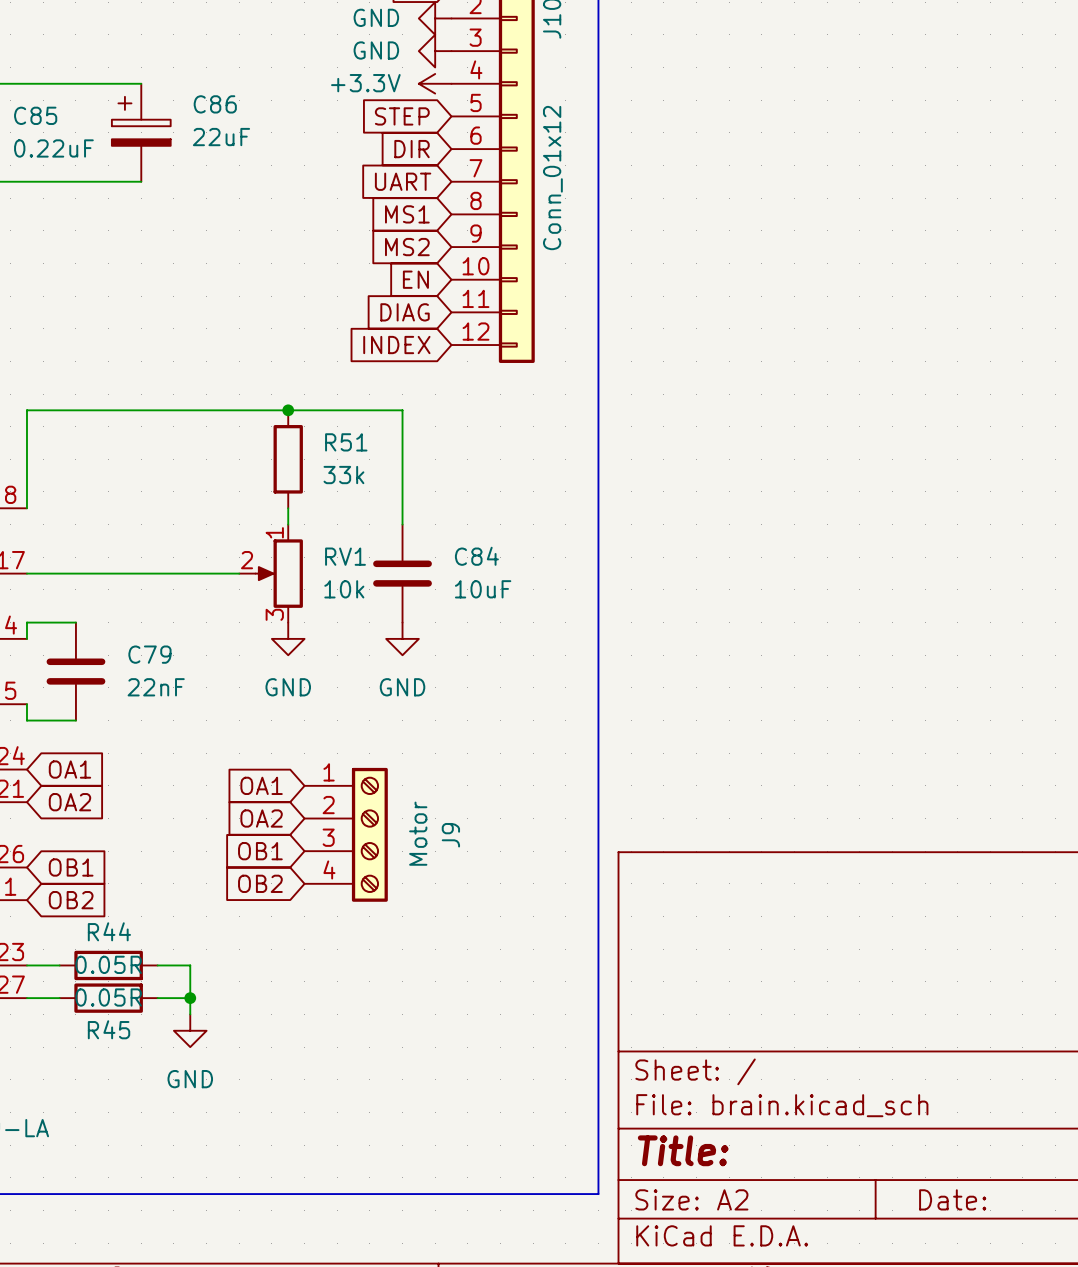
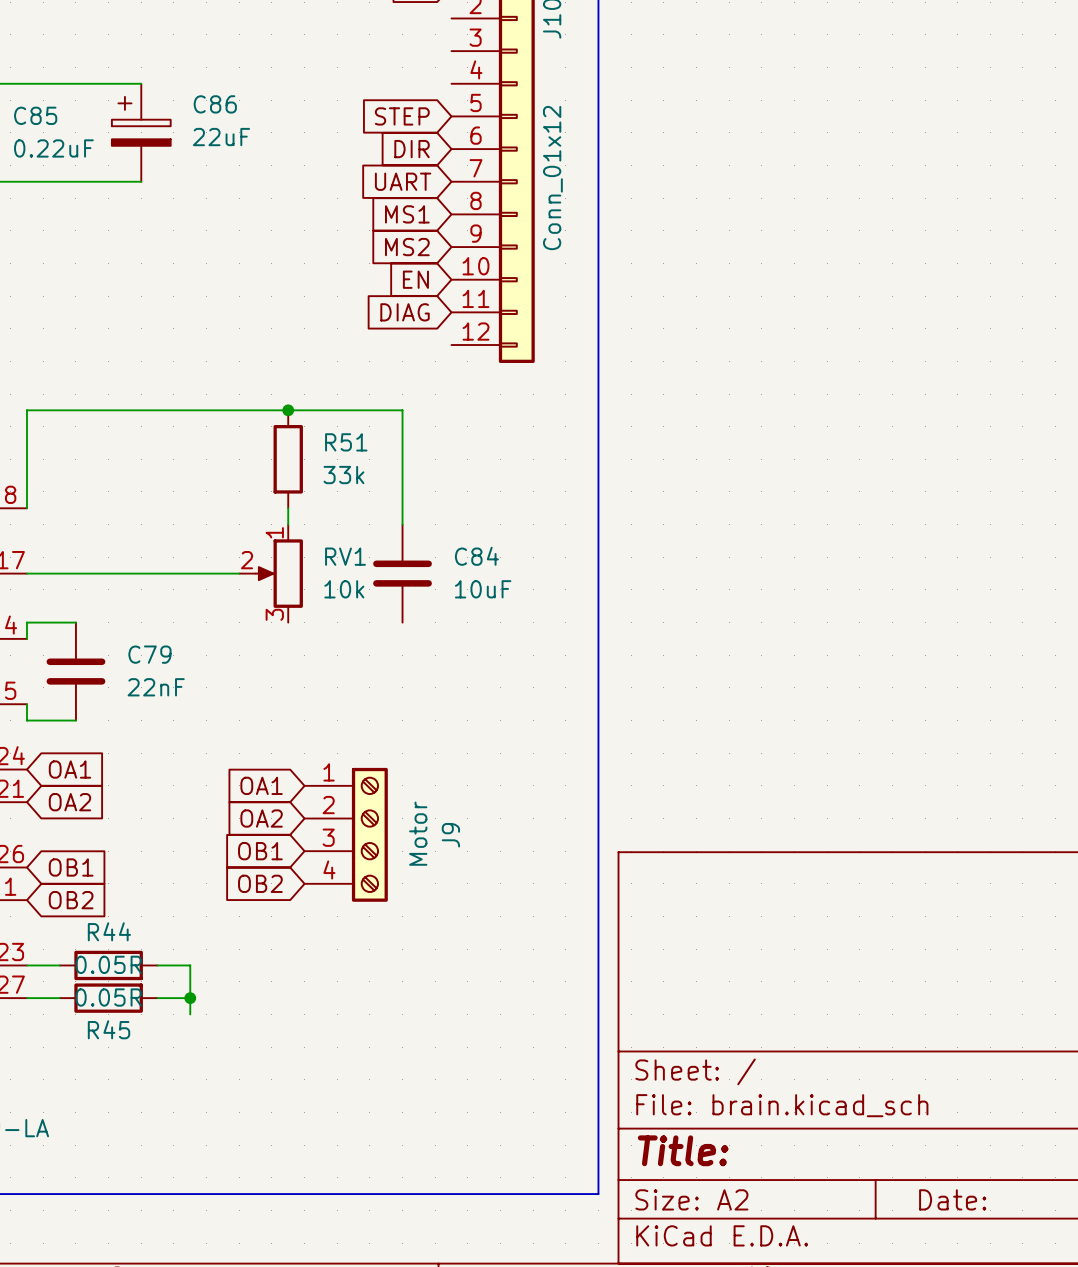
power symbol: GND (435, 18) -> none
power symbol: GND (435, 51) -> none
power symbol: +3.3V (435, 83) -> none
global label: INDEX (396, 345) -> none
power symbol: GND (288, 638) -> none
power symbol: GND (402, 638) -> none
power symbol: GND (190, 1030) -> none

